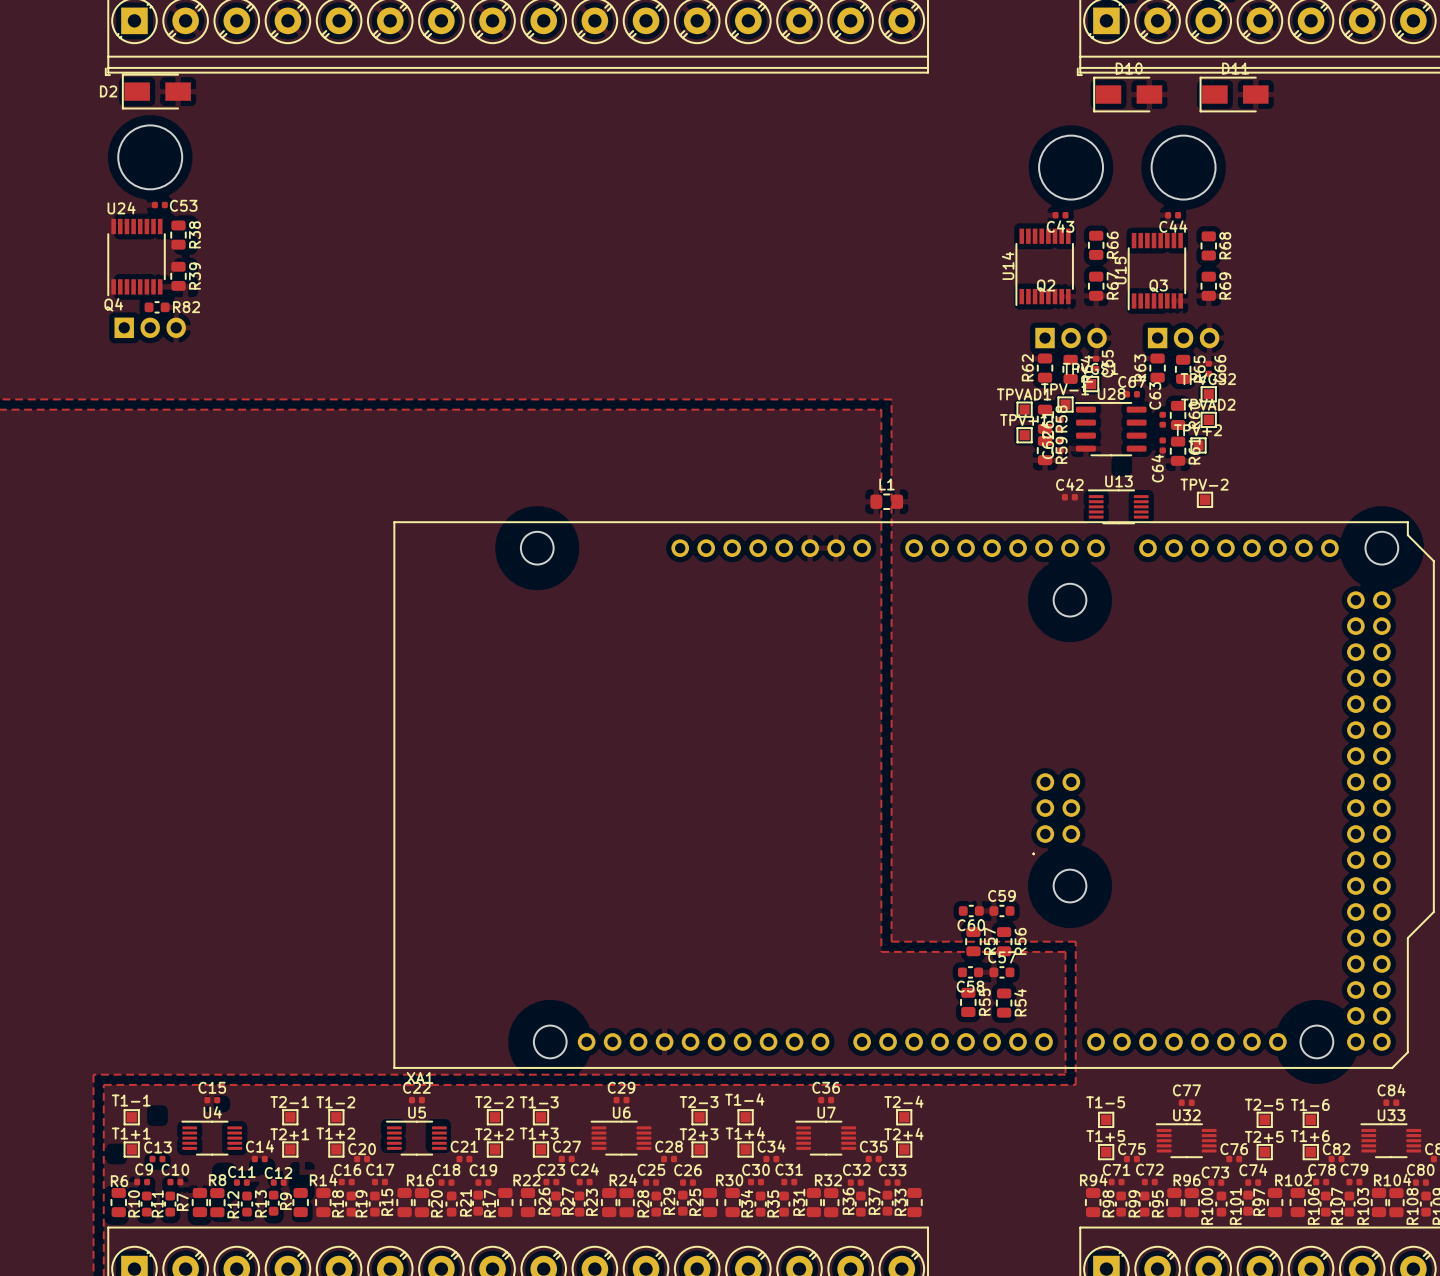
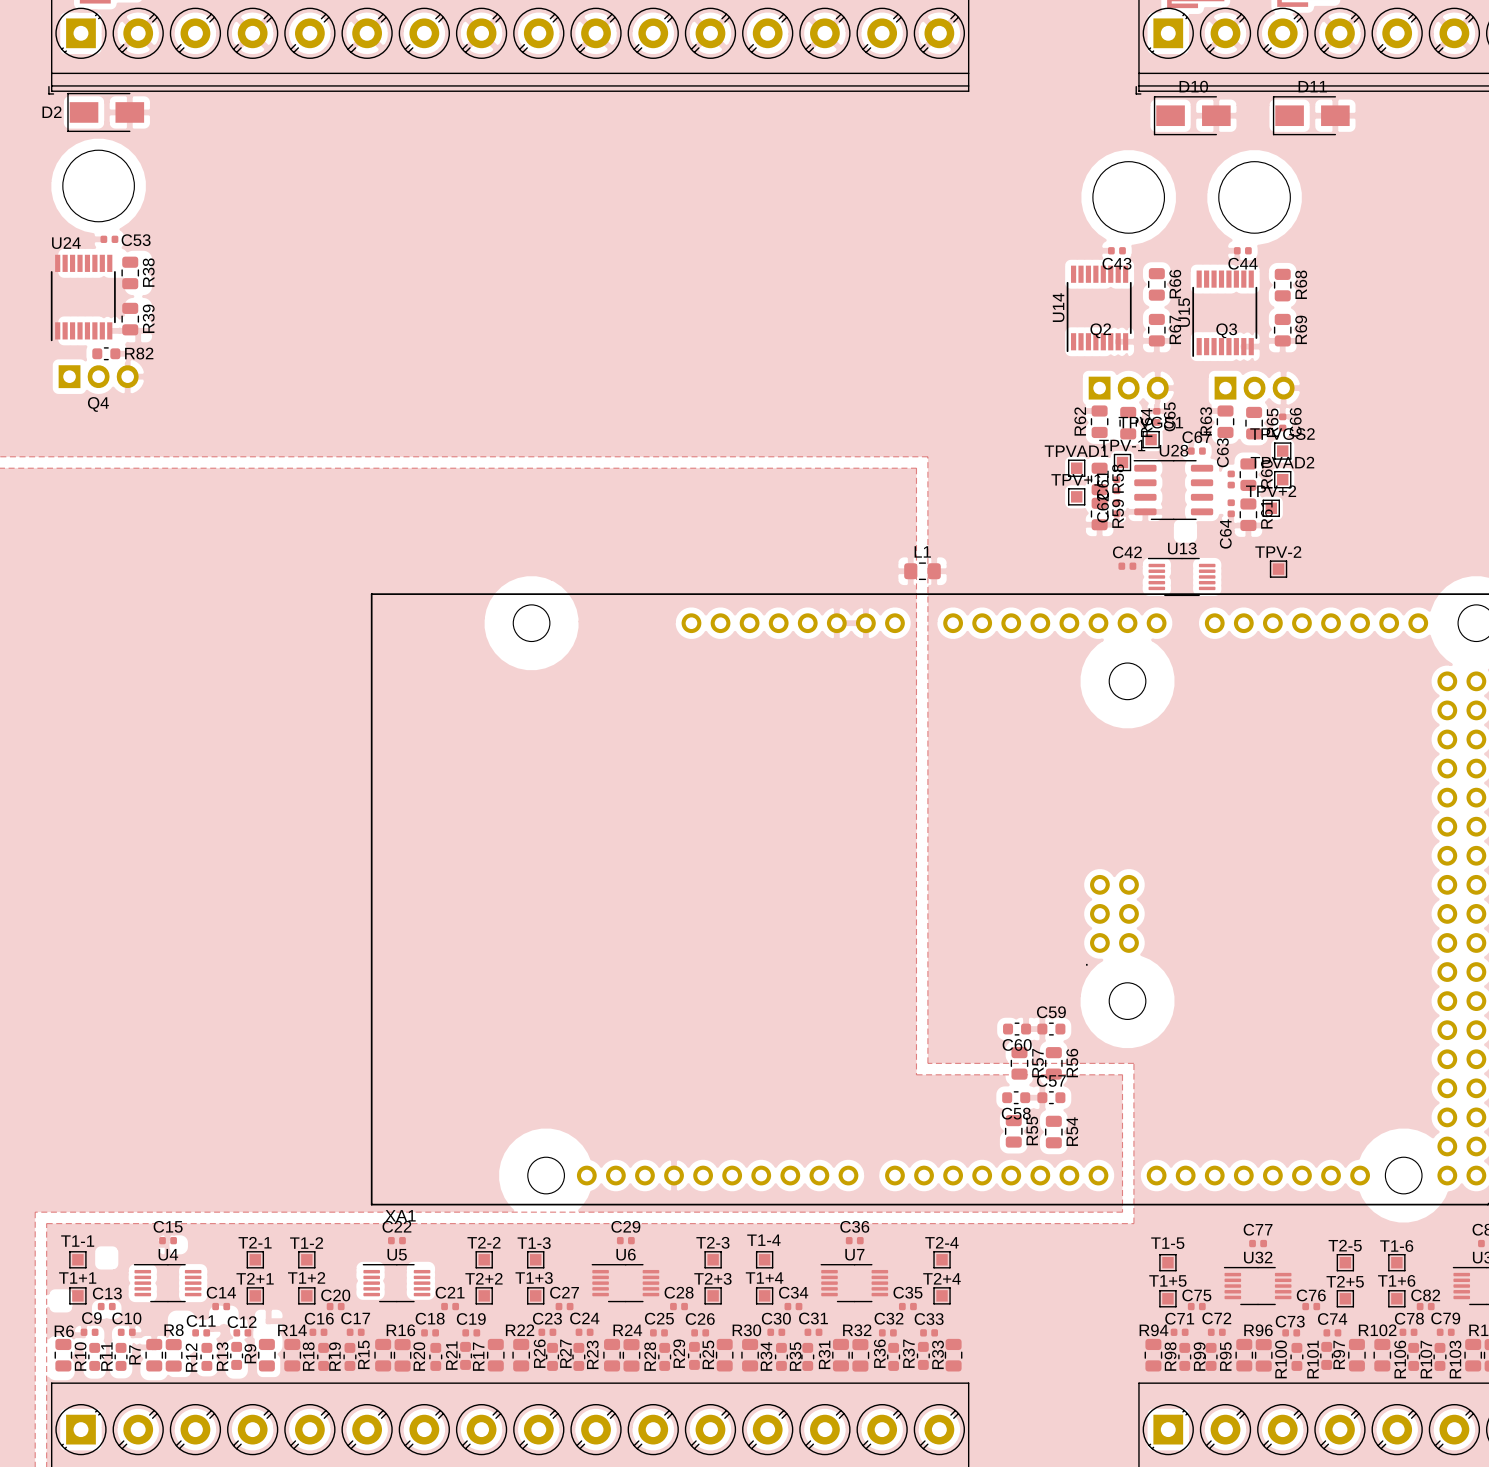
Q4 name position: Q4 (113, 304) -> Q4 (98, 404)

